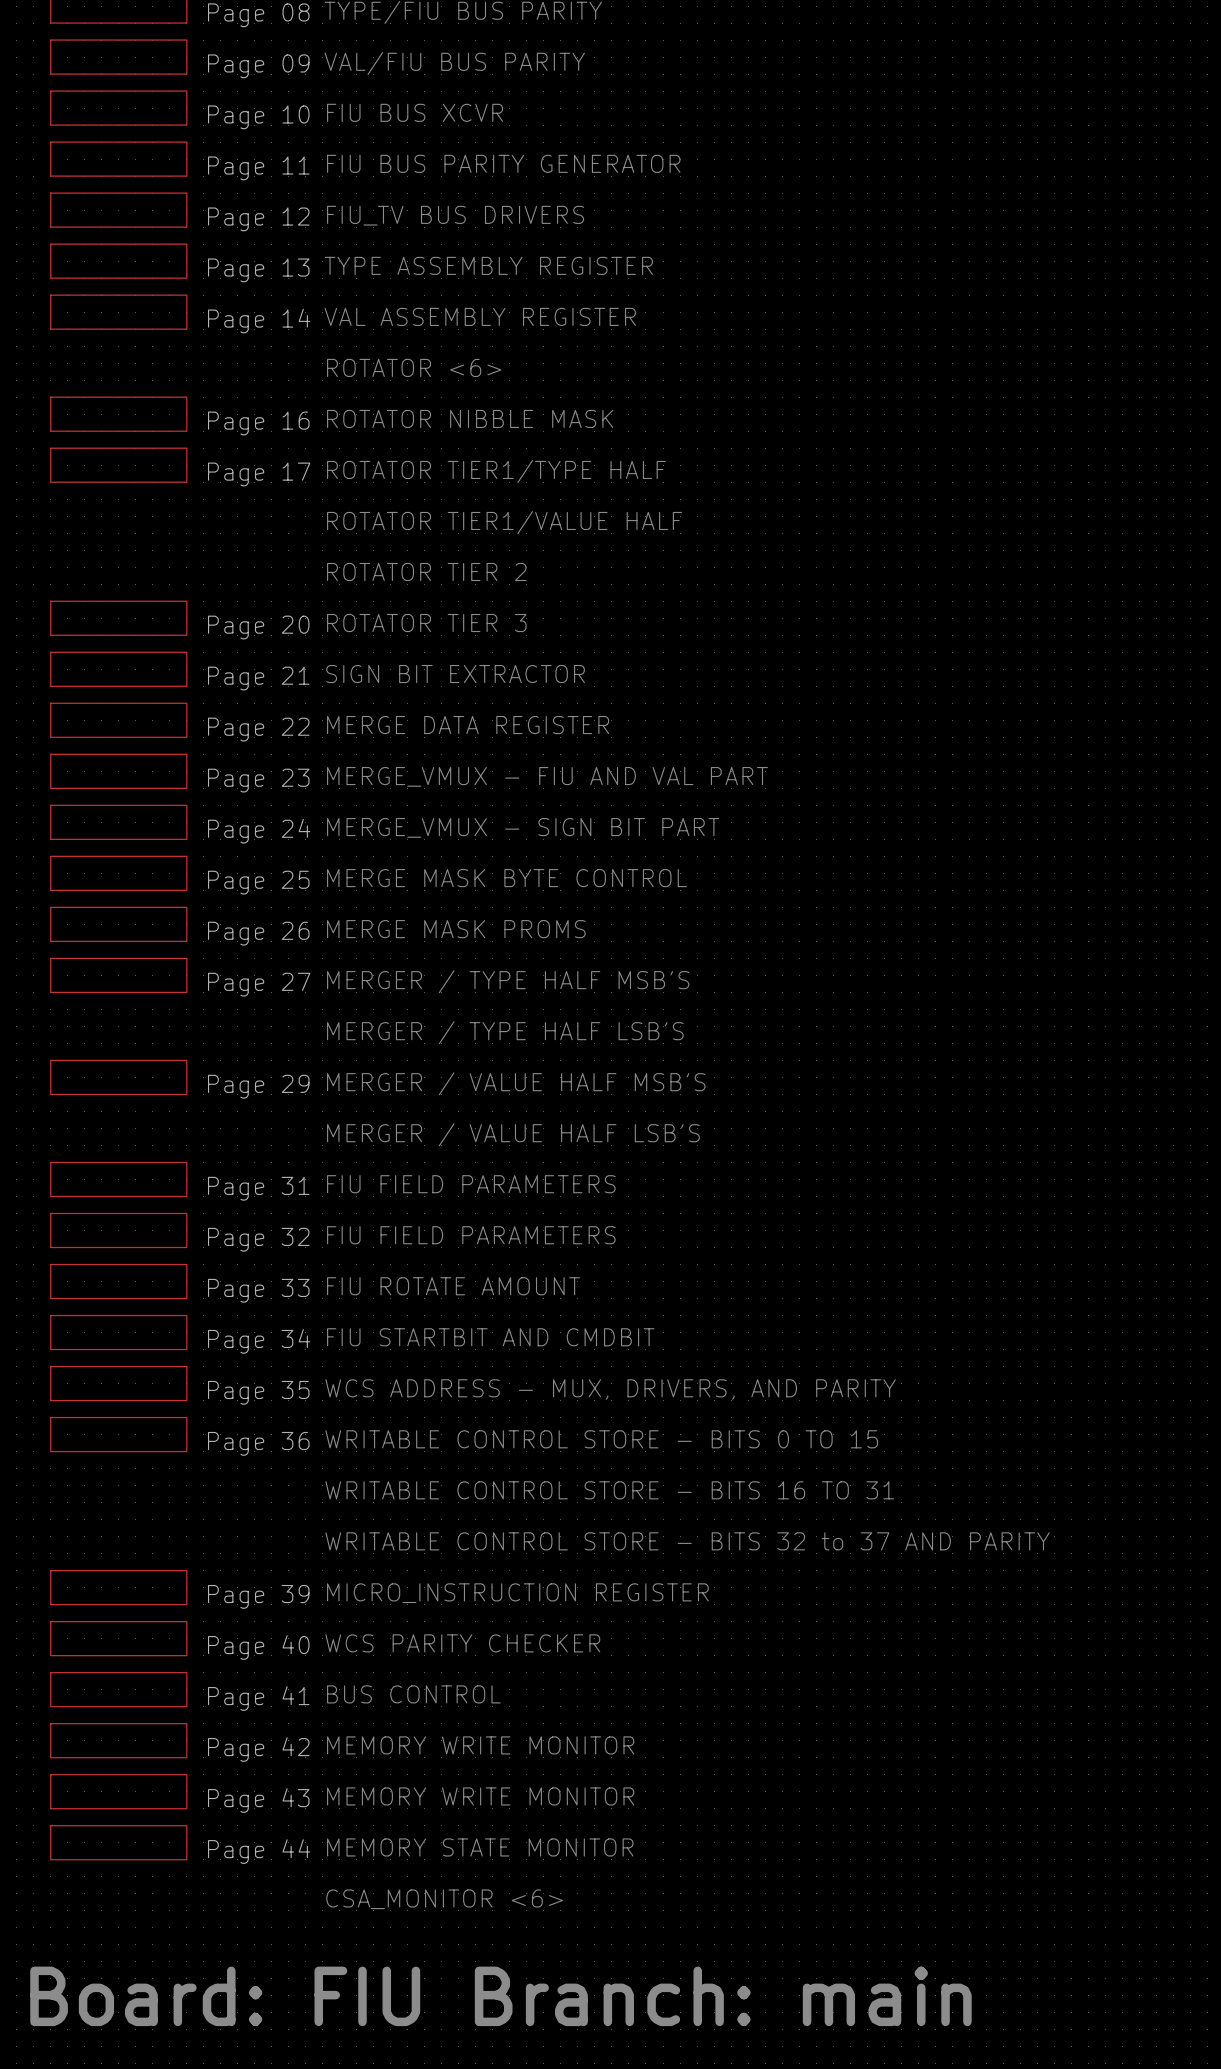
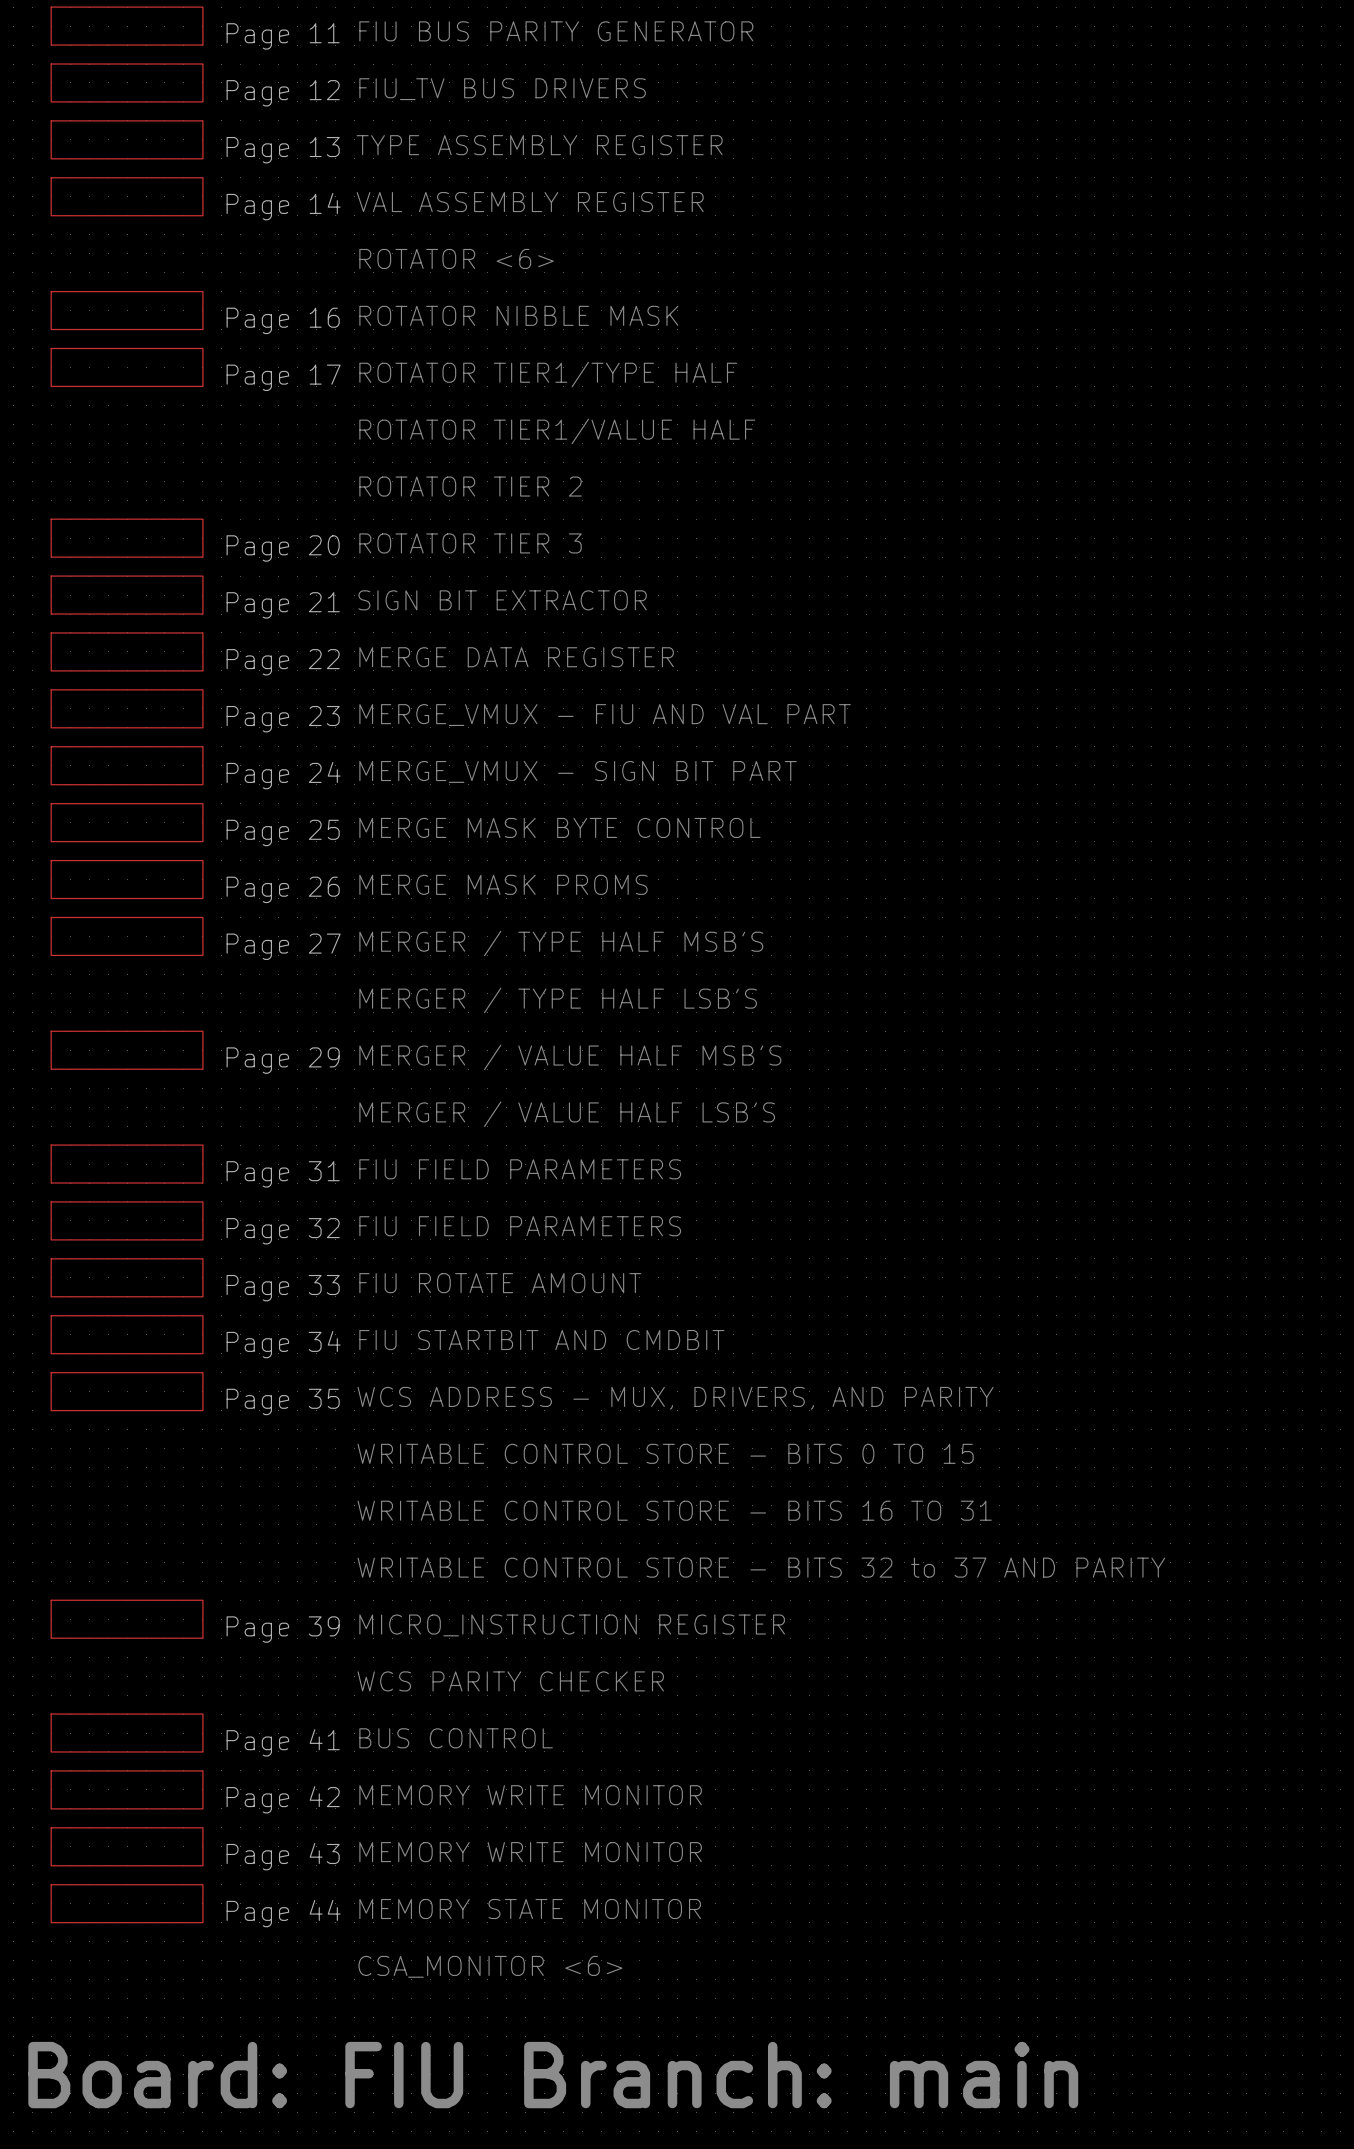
sheet Page 36: (118, 1434) -> none
sheet Page 40: (118, 1638) -> none

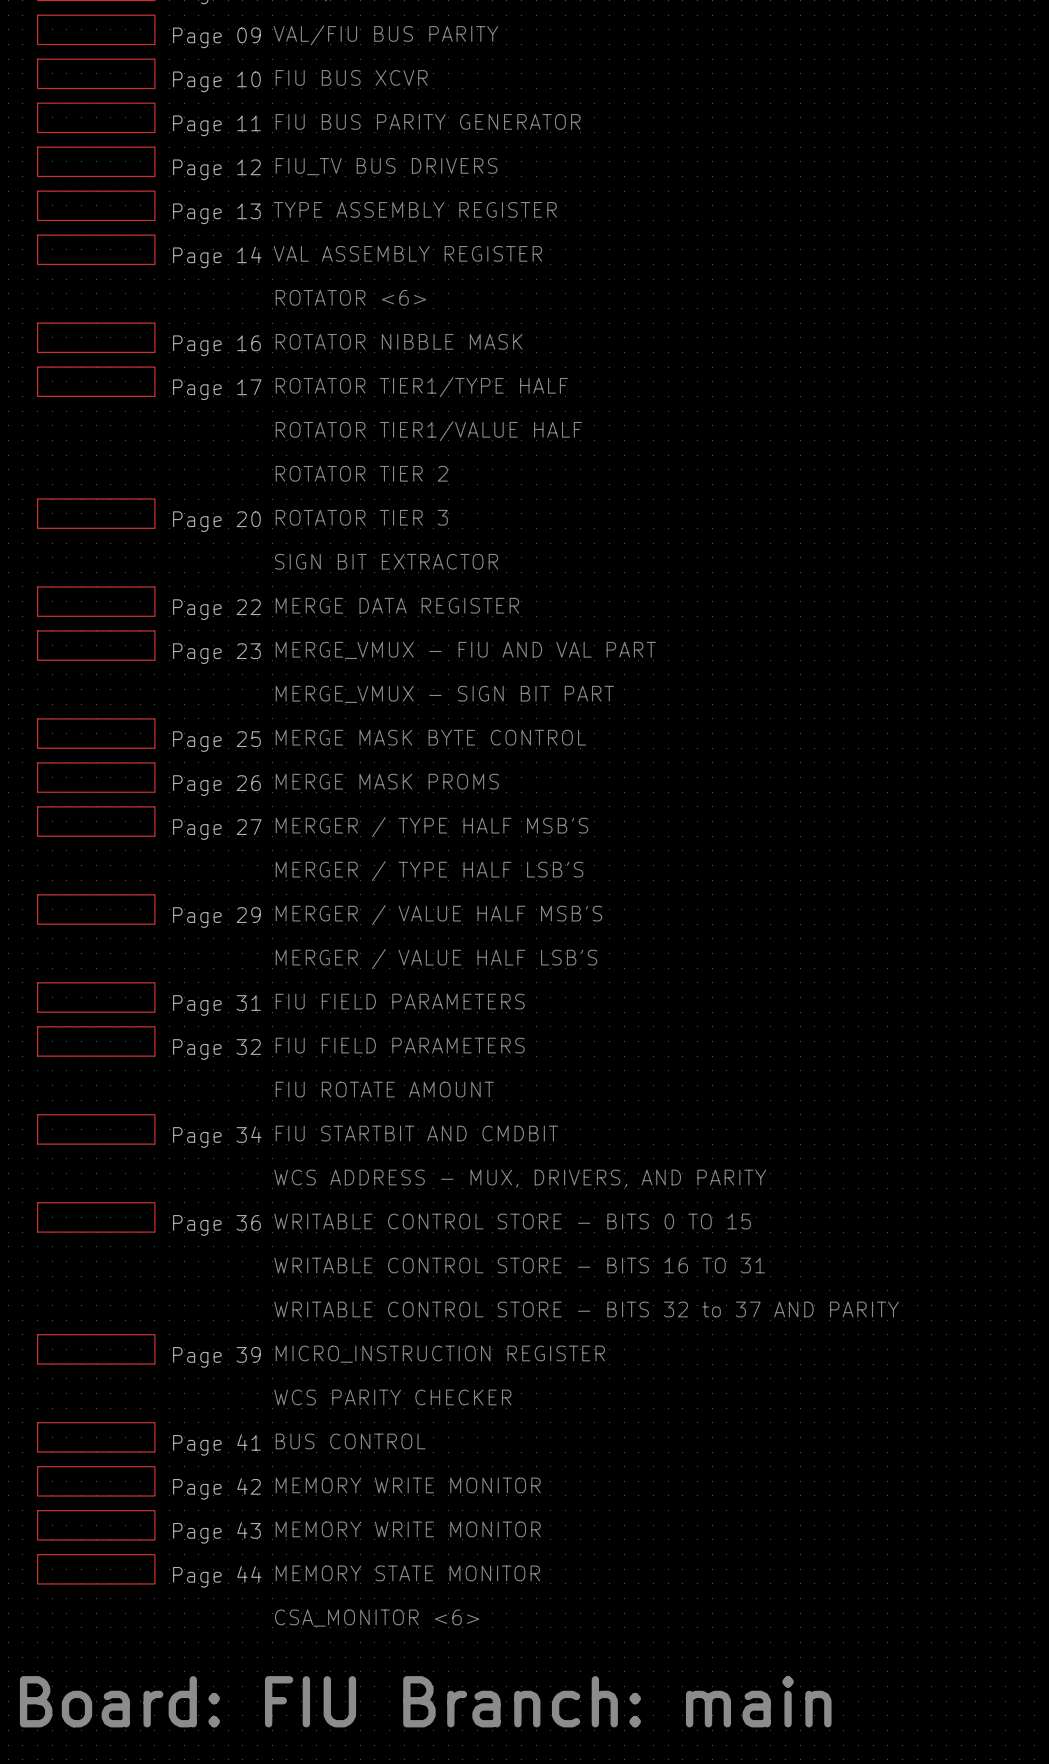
sheet Page 21: (127, 595) -> none
sheet Page 24: (127, 765) -> none
sheet Page 33: (127, 1277) -> none
sheet Page 35: (127, 1391) -> none
sheet Page 36: none -> (96, 1217)

